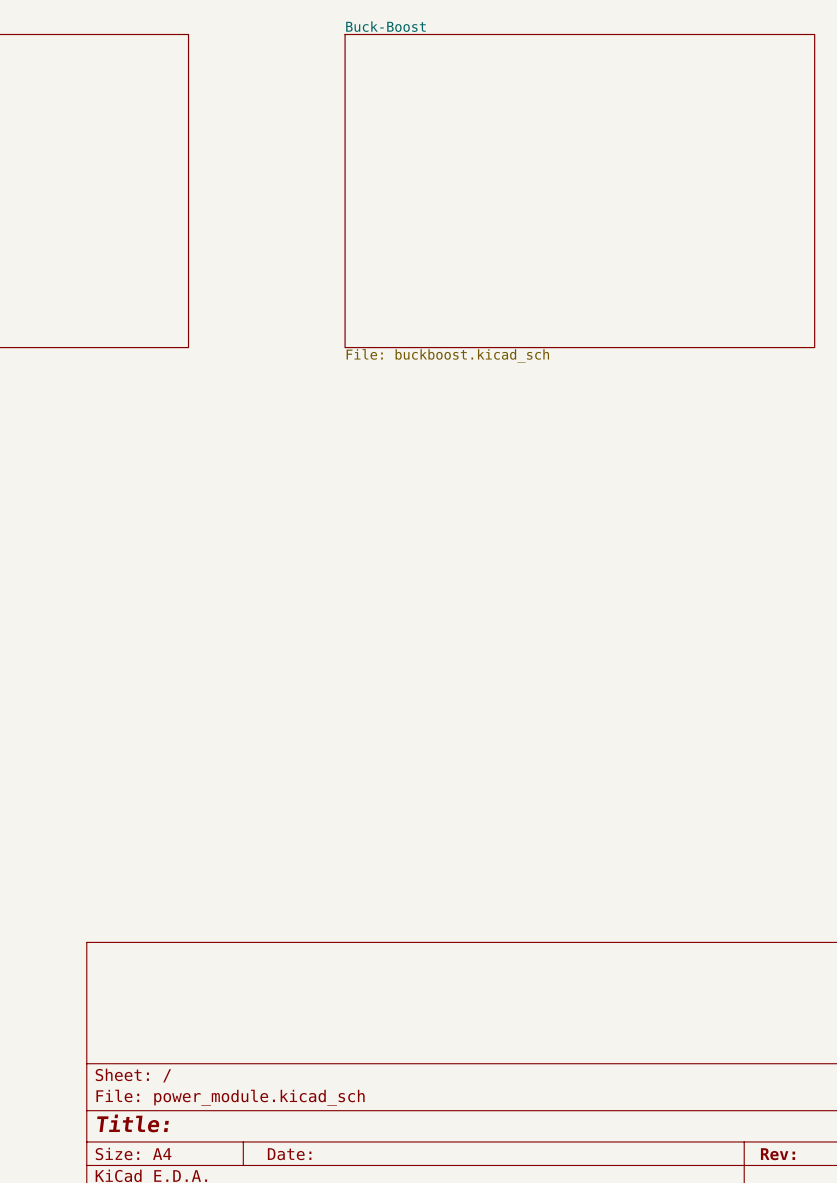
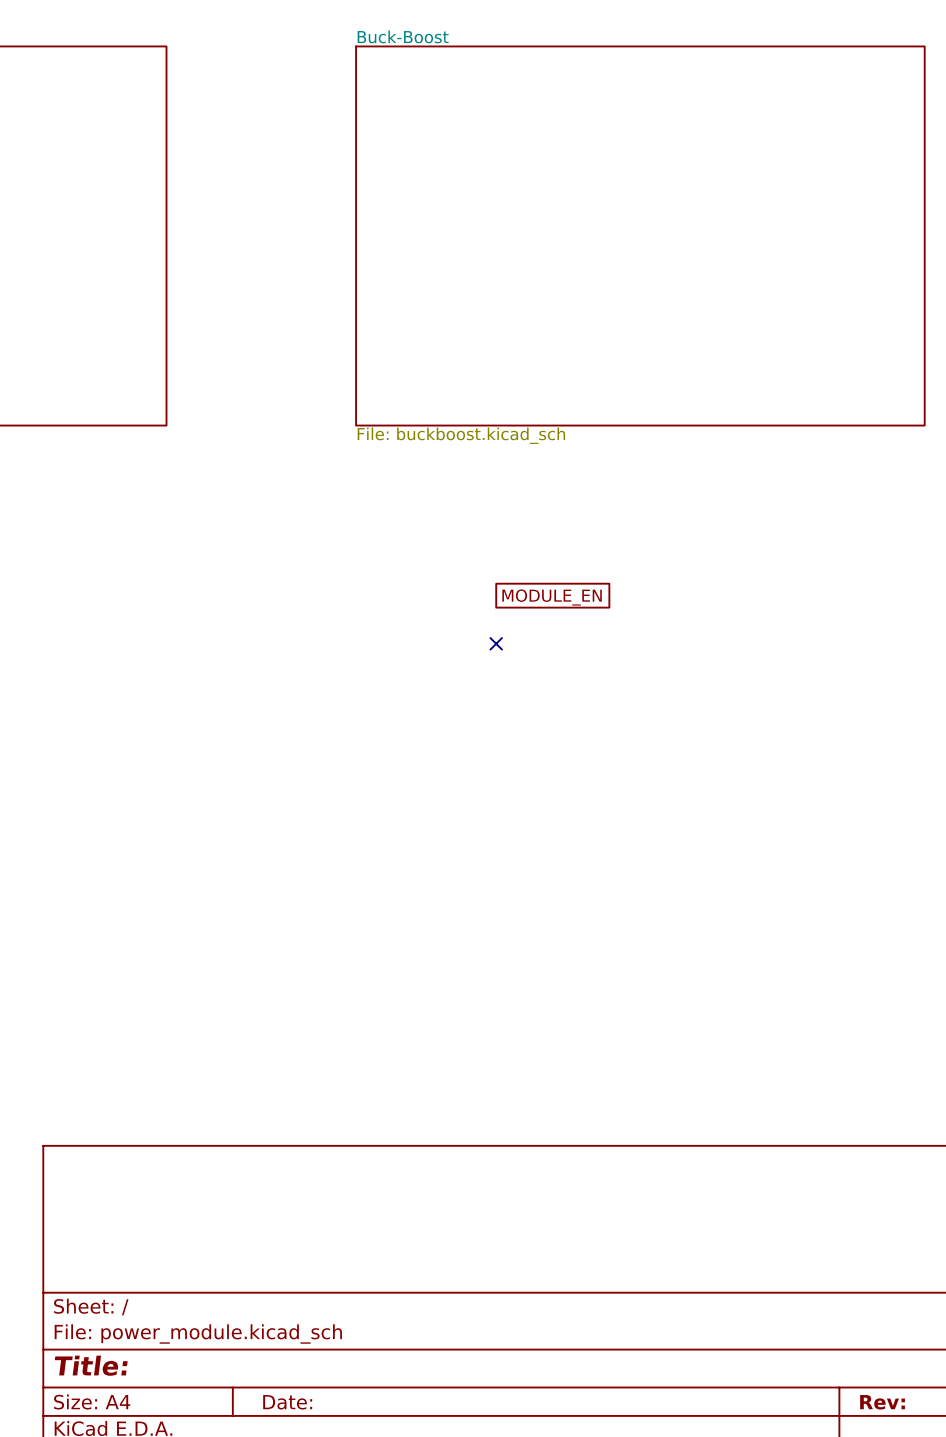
global label: none -> MODULE_EN (552, 597)
no-connect mark: none -> (496, 643)

